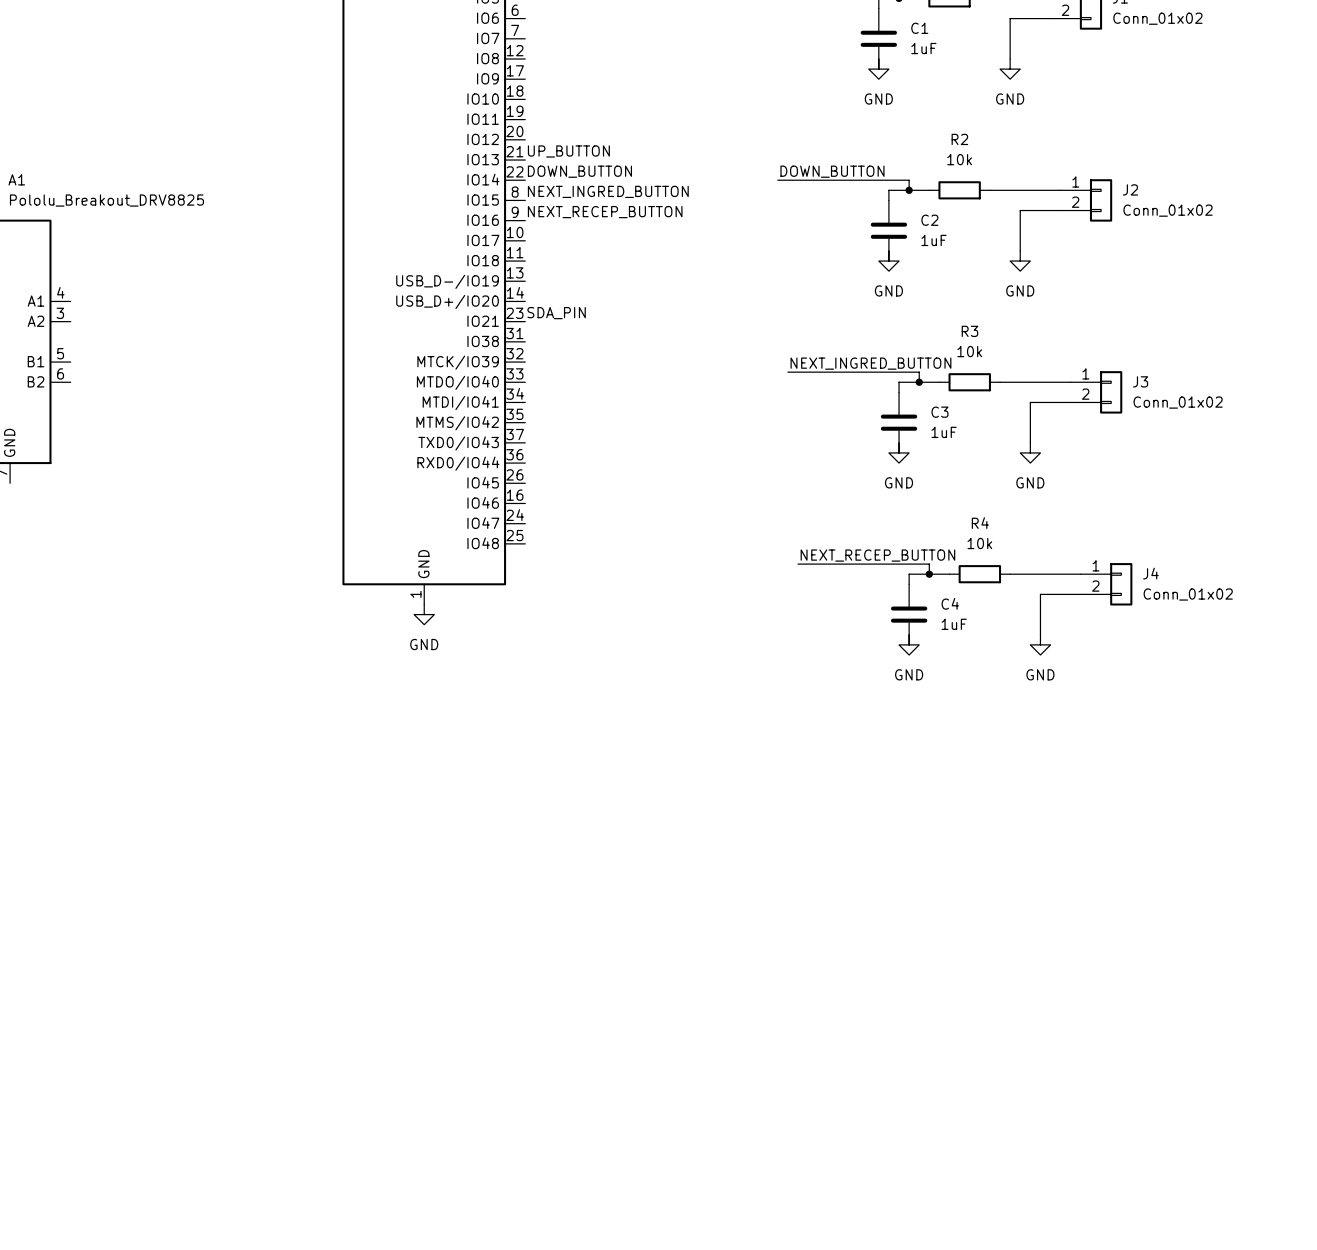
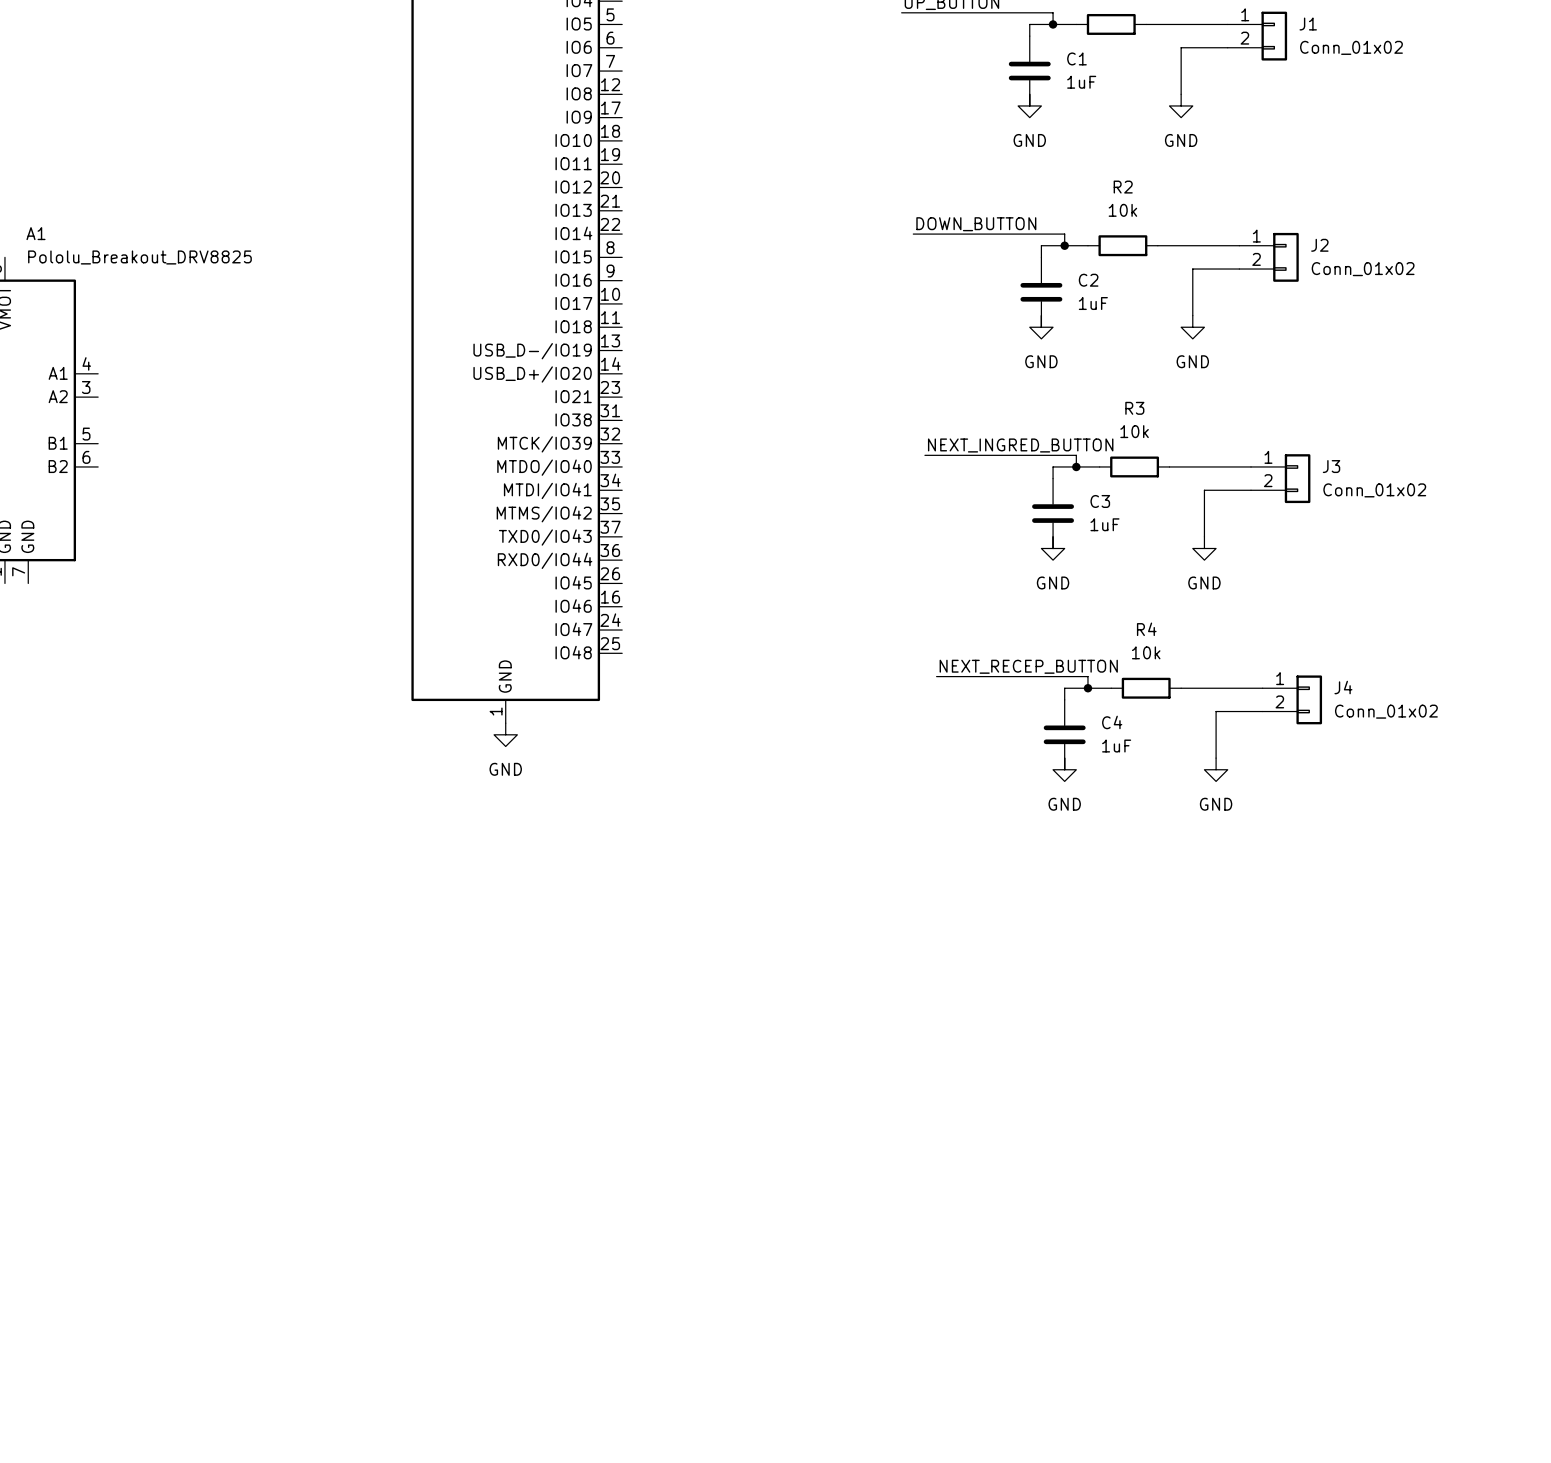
label: UP_BUTTON (568, 151) -> none
label: DOWN_BUTTON (579, 171) -> none
label: NEXT_INGRED_BUTTON (608, 191) -> none
label: NEXT_RECEP_BUTTON (605, 212) -> none
label: SDA_PIN (556, 313) -> none

